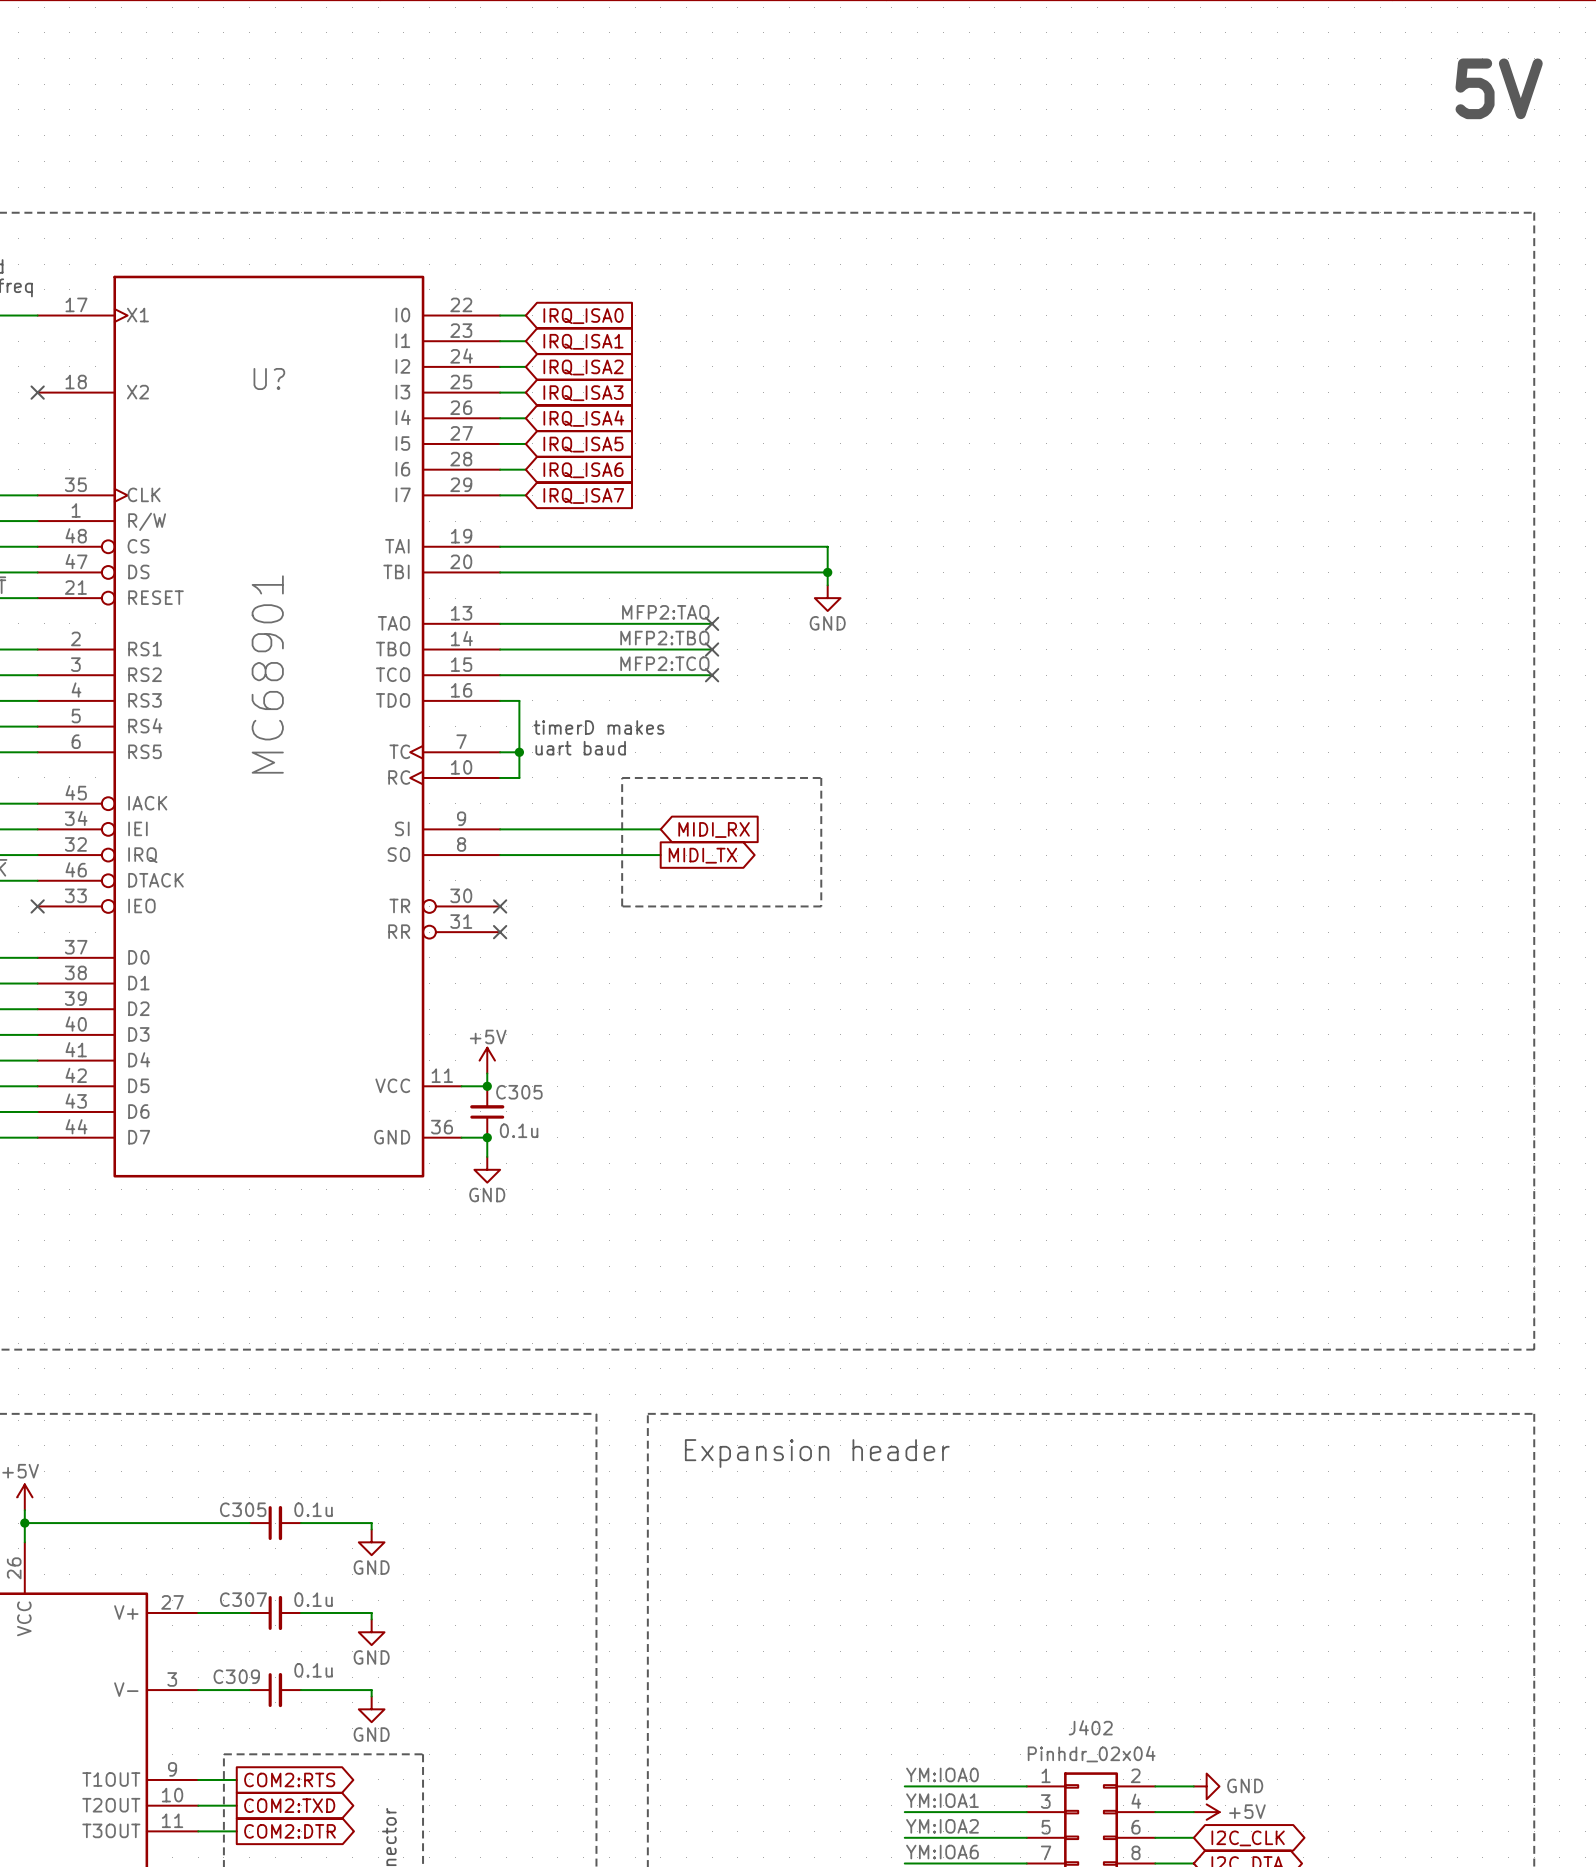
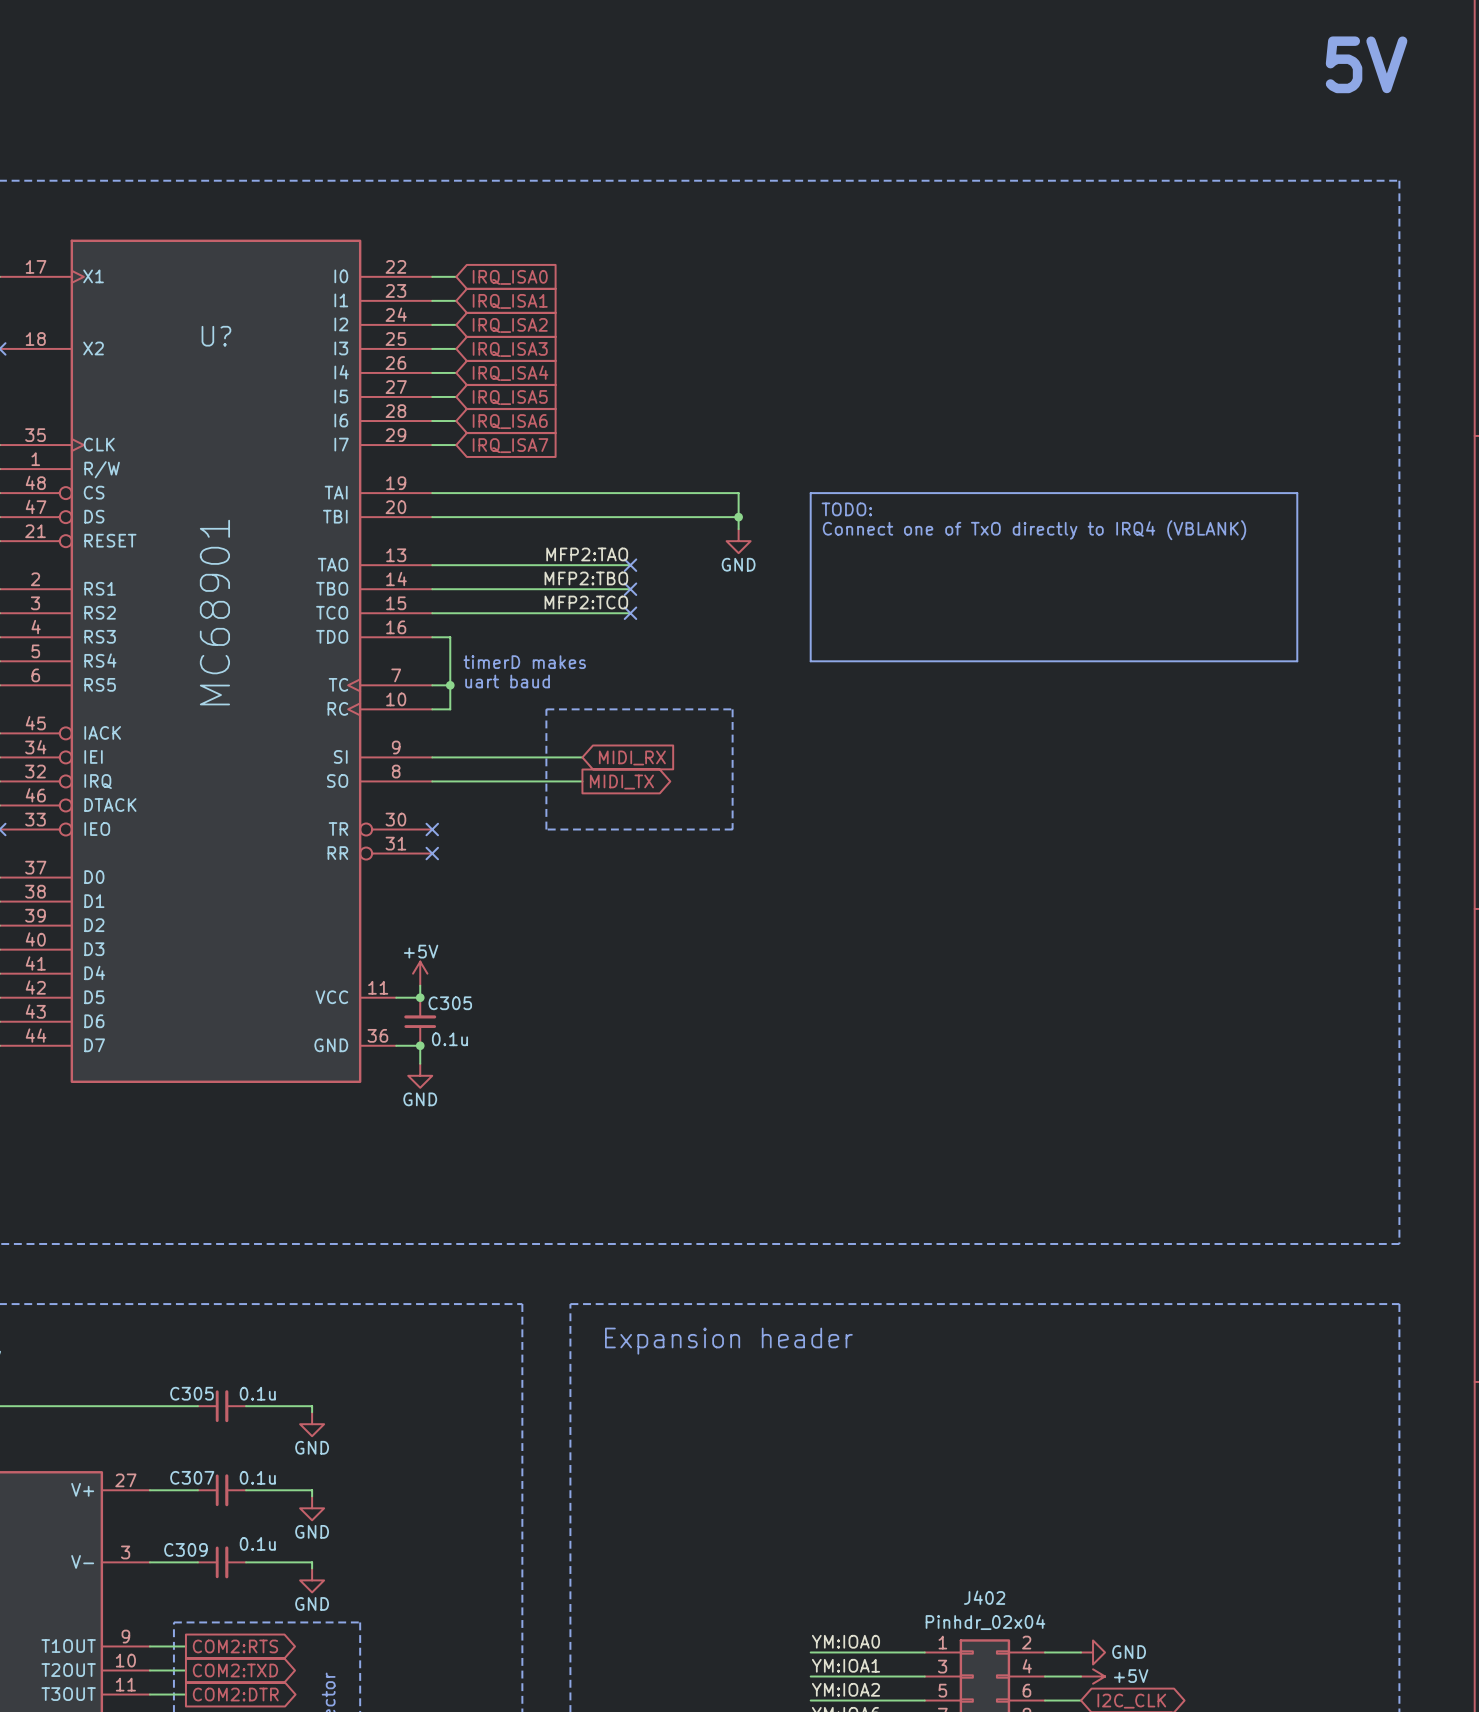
line: none -> (810, 493) (1297, 493) (1297, 661) (810, 661) (810, 493)
text: none -> TODO: (846, 509)
text: none -> Connect one of TxO directly to IRQ4 (VBLANK) (1034, 530)

